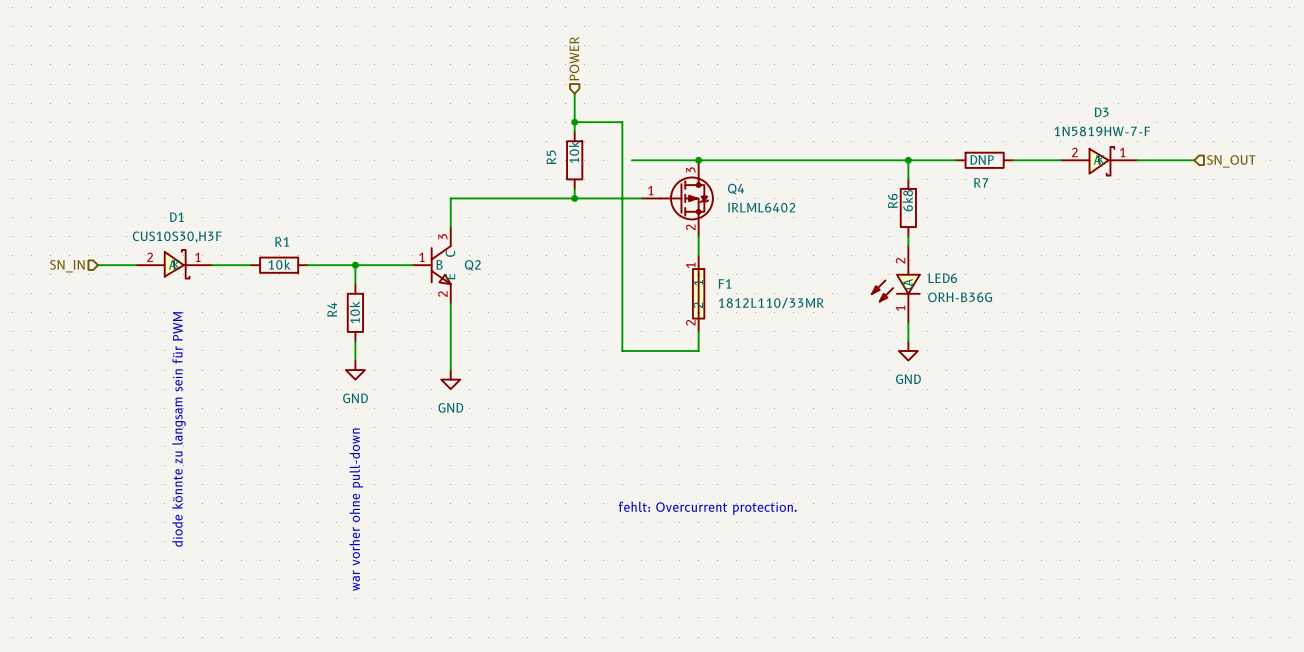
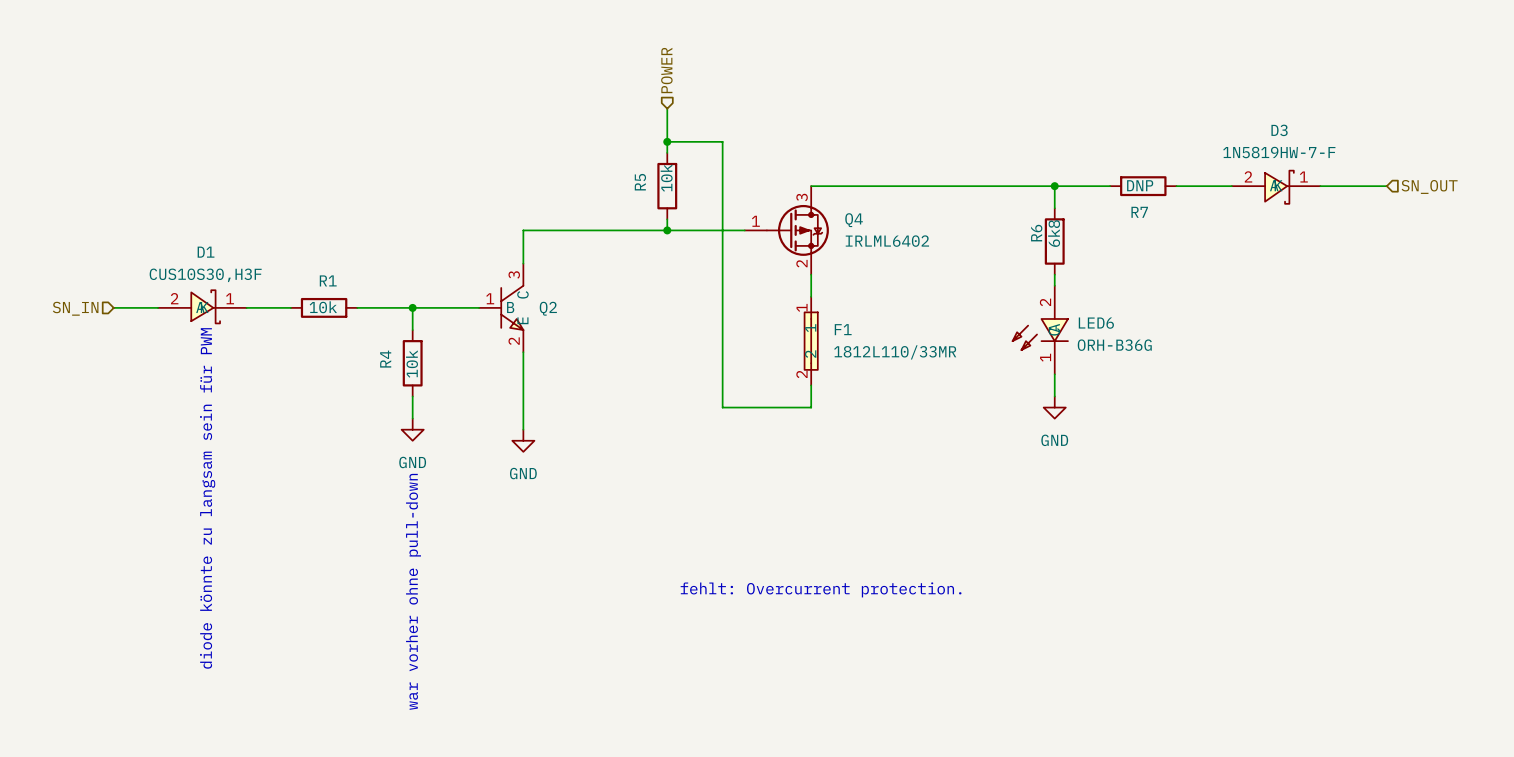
wire: (631, 160) (698, 160) -> none
junction: (698, 160) -> none

